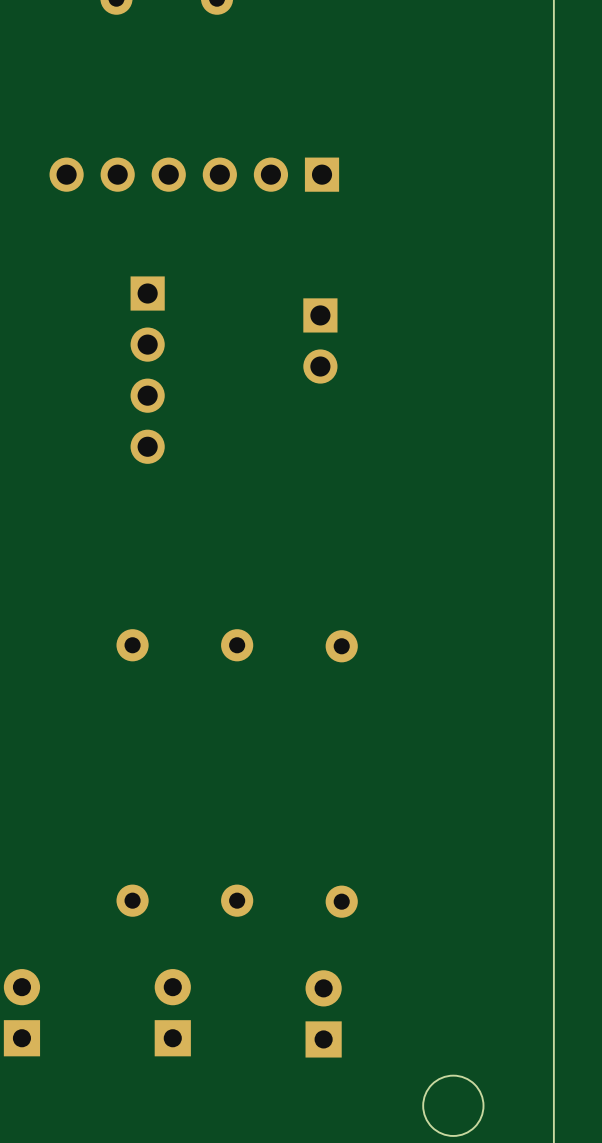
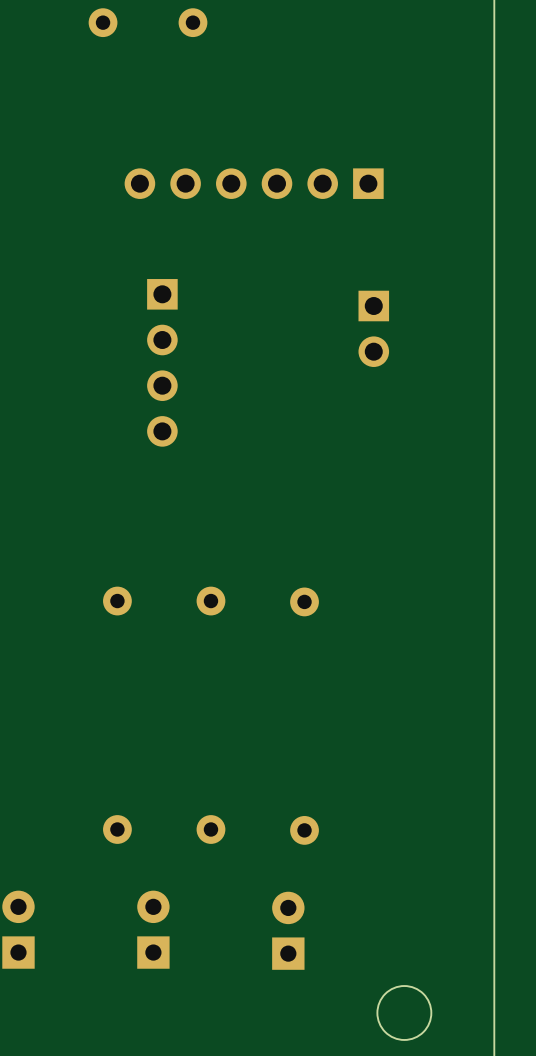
part position: (194, 174) -> (254, 183)
part position: (320, 340) -> (373, 328)
part position: (147, 370) -> (162, 362)

